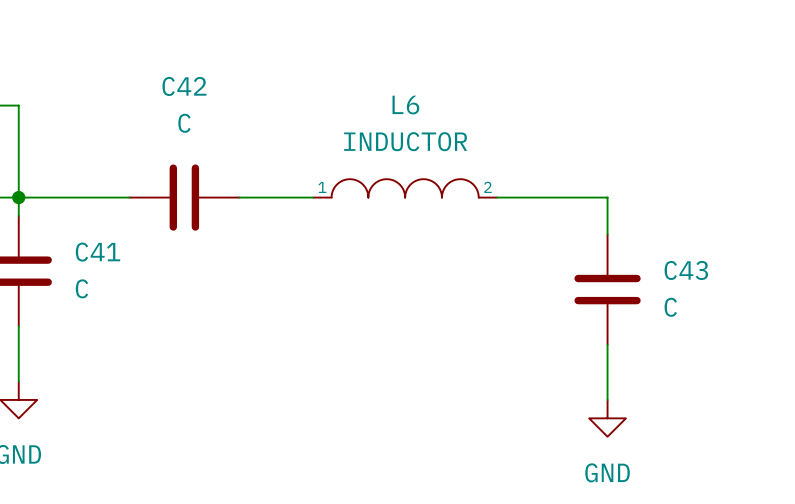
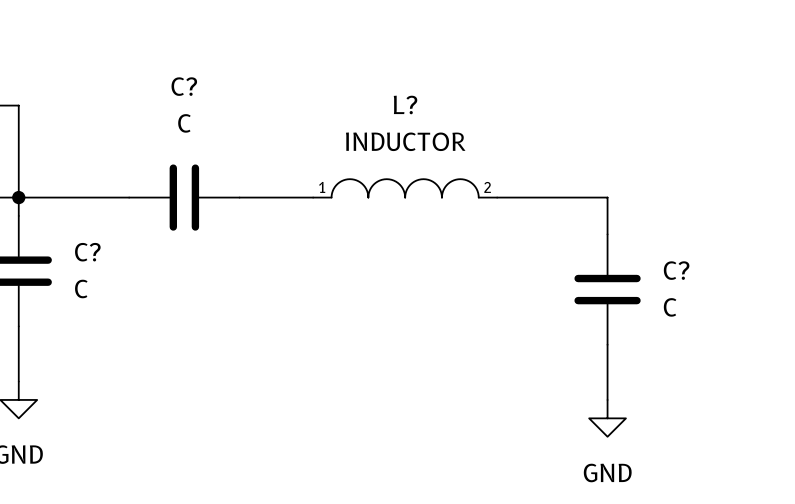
C42 name: C42 (184, 86) -> C? (184, 86)
L6 name: L6 (405, 105) -> L? (405, 104)
C41 name: C41 (97, 252) -> C? (87, 252)
C43 name: C43 (686, 270) -> C? (676, 270)

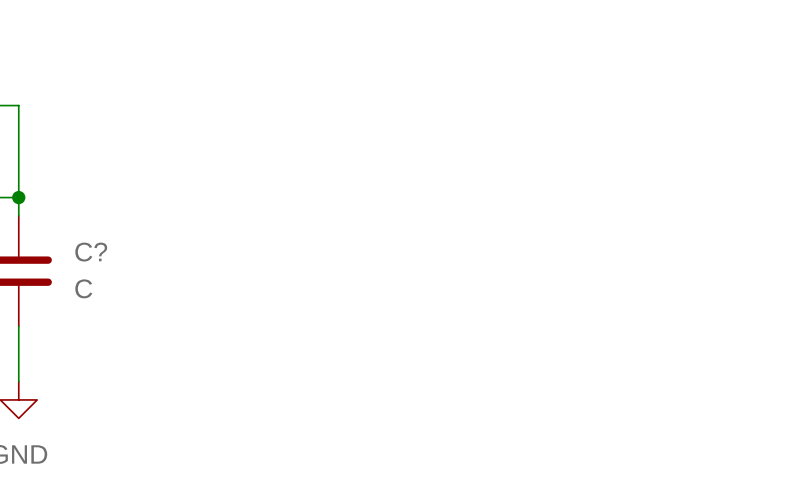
L?: INDUCTOR (405, 188) -> none
wire: (18, 197) (129, 197) -> none
C?: C (184, 197) -> none
wire: (239, 197) (313, 197) -> none
wire: (497, 197) (607, 197) (607, 234) -> none
C?: C (607, 289) -> none
wire: (607, 344) (607, 399) -> none
power symbol: GND (607, 418) -> none

